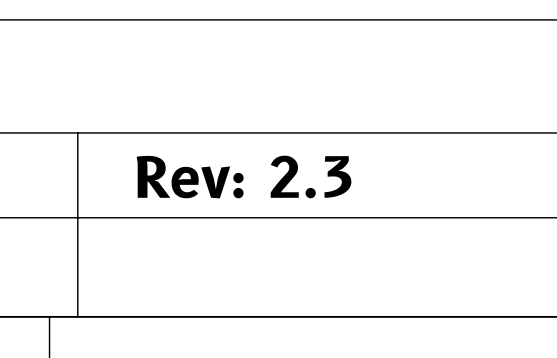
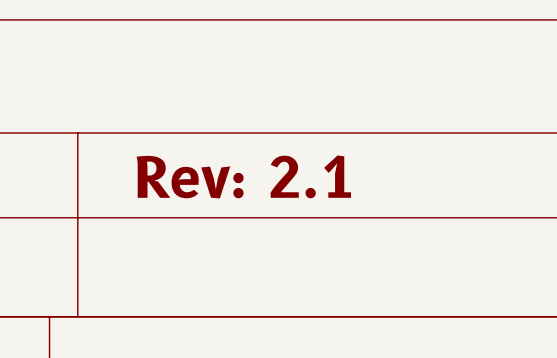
title block: Rev: 2.3 (244, 177) -> Rev: 2.1 (243, 176)

